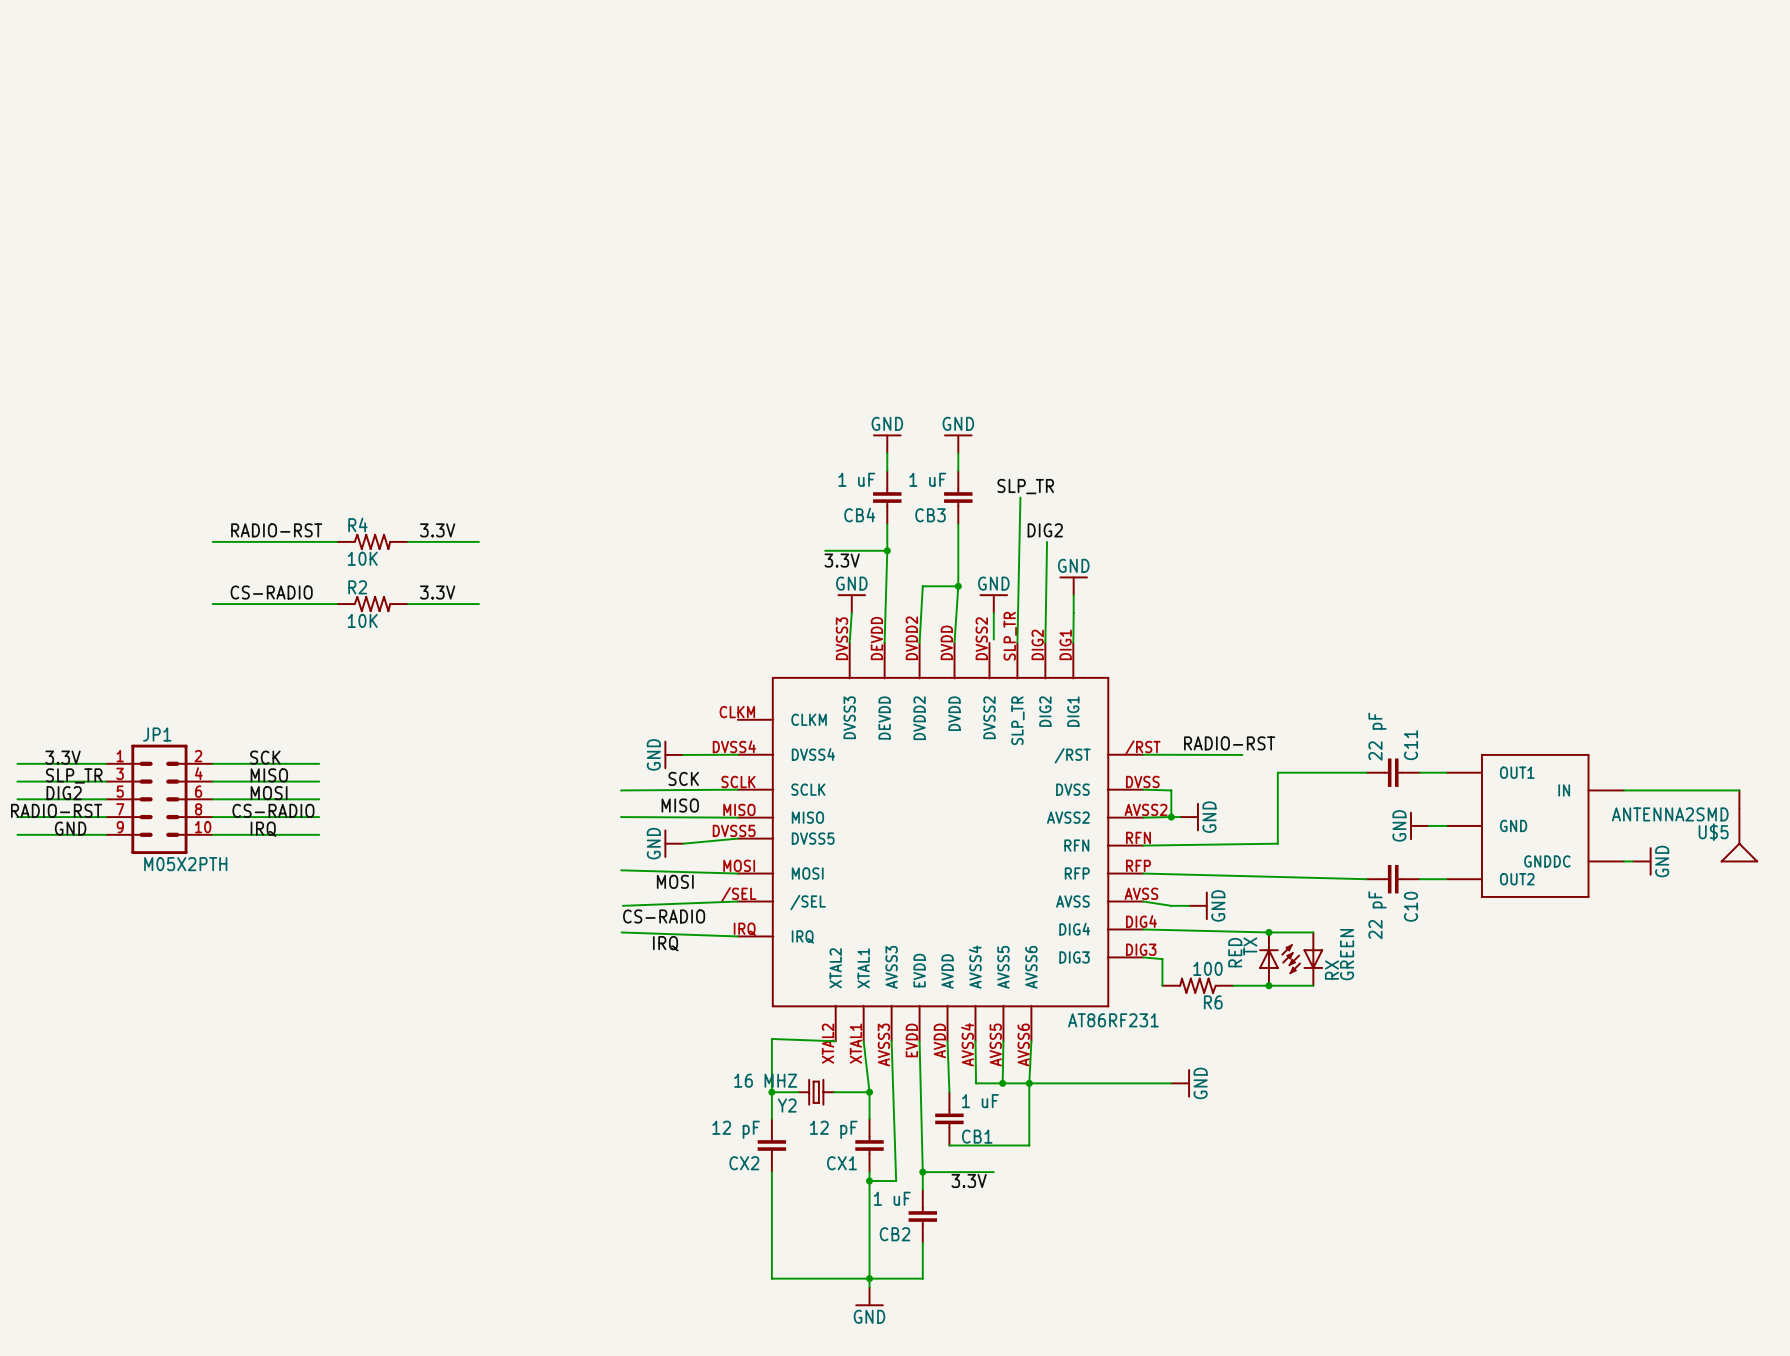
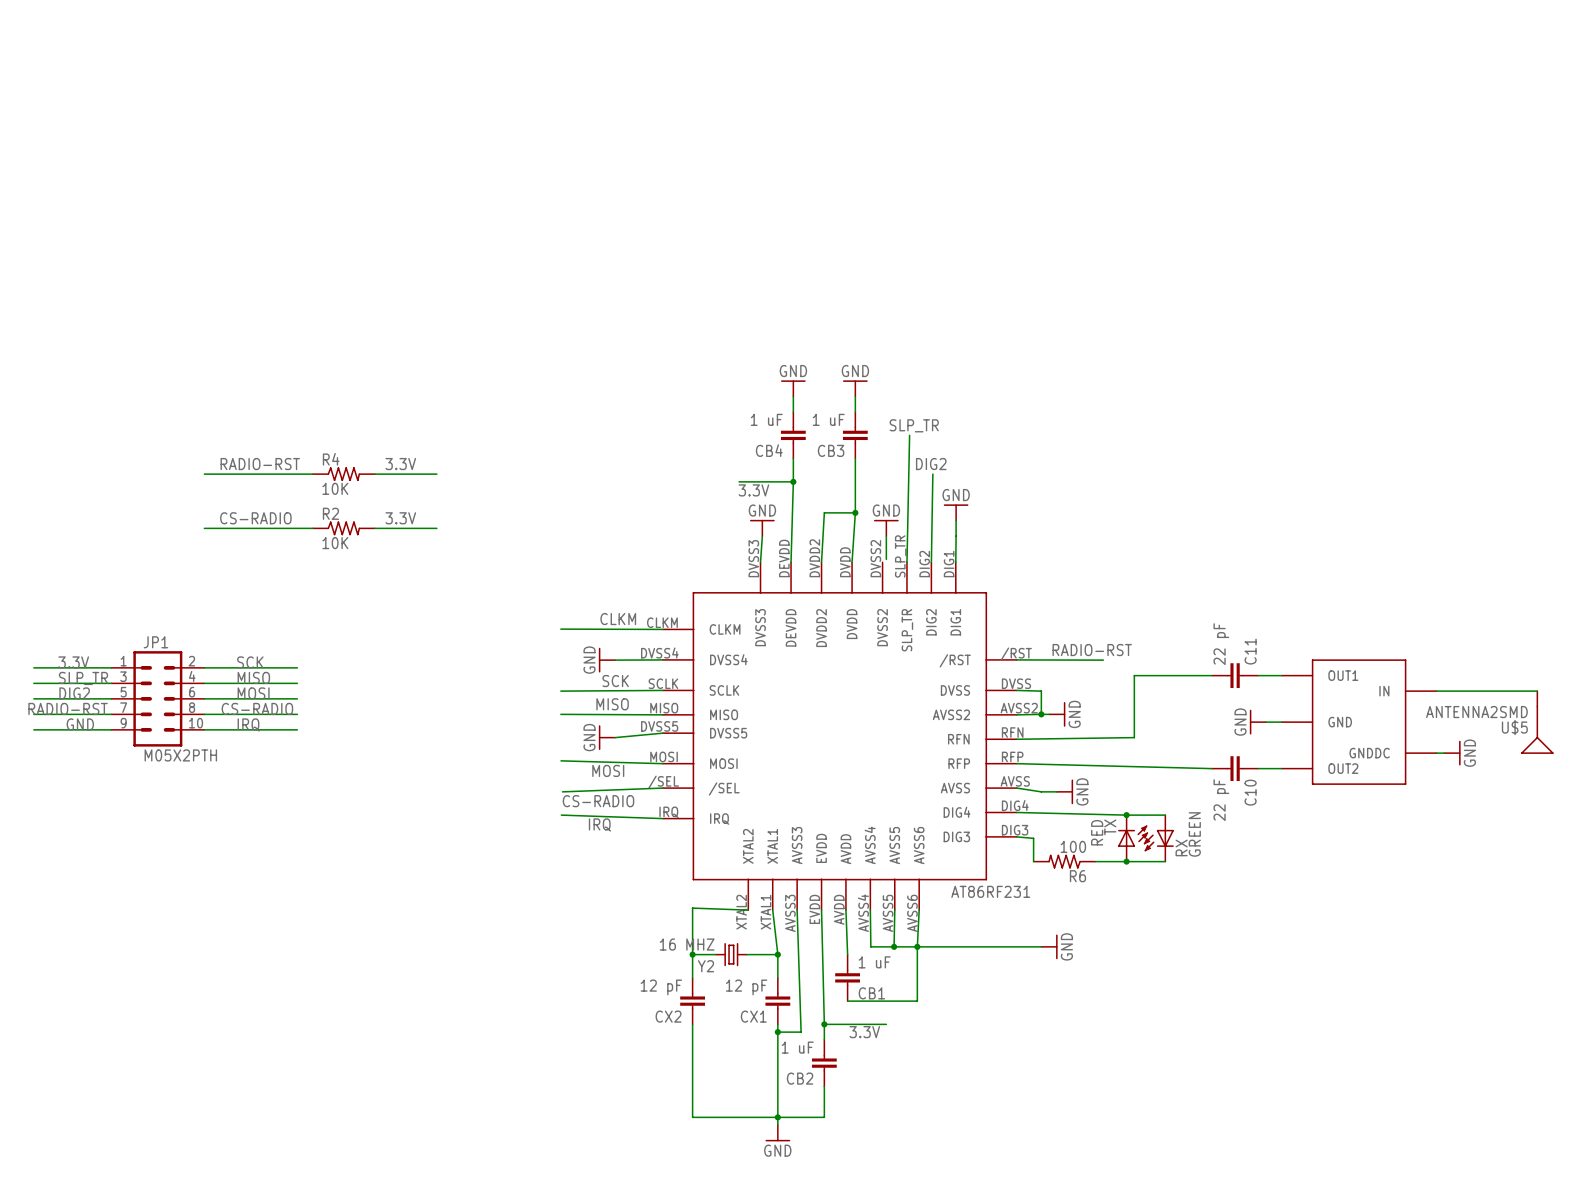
label: none -> CLKM (618, 619)
wire: none -> (560, 629) (662, 629)

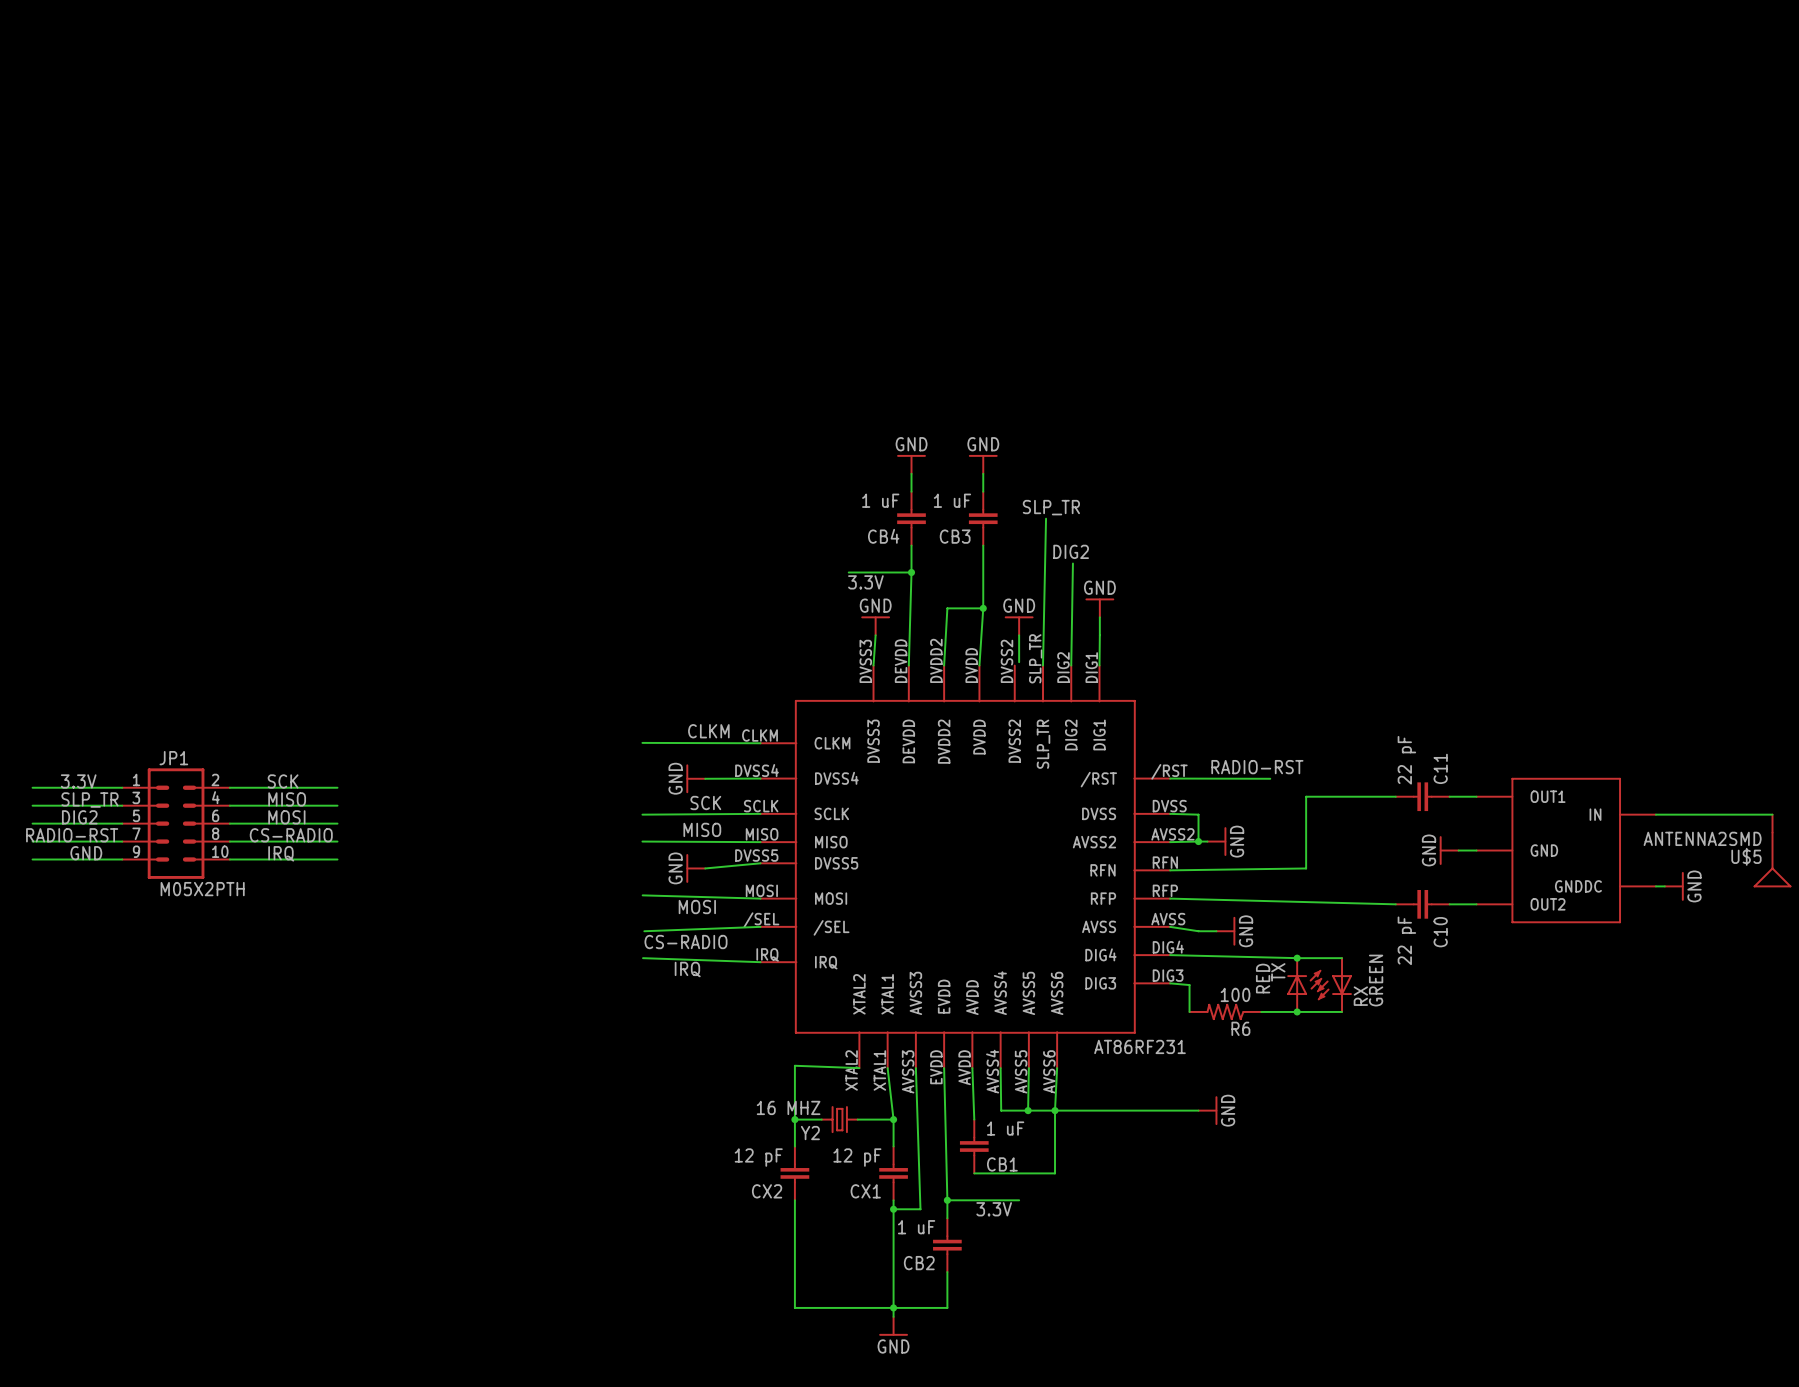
label: RADIO-RST (260, 464) -> none
label: 3.3V (400, 464) -> none
wire: (204, 474) (312, 474) -> none
R4: 10K (343, 474) -> none
wire: (374, 474) (436, 474) -> none
label: CS-RADIO (255, 518) -> none
label: 3.3V (400, 518) -> none
wire: (204, 528) (312, 528) -> none
R2: 10K (343, 528) -> none
wire: (374, 528) (436, 528) -> none

